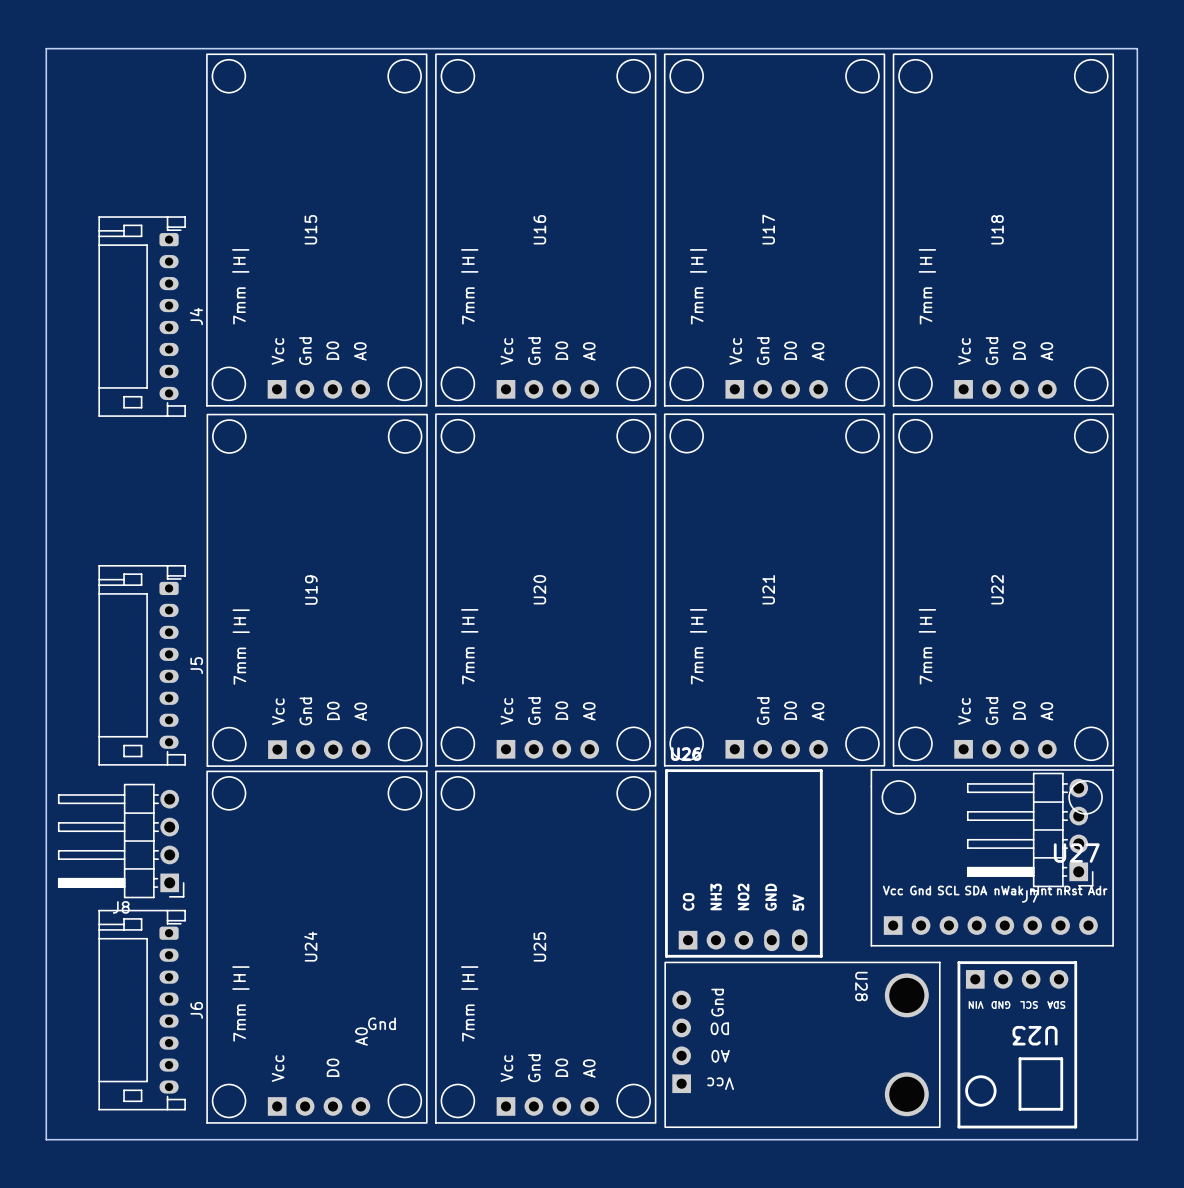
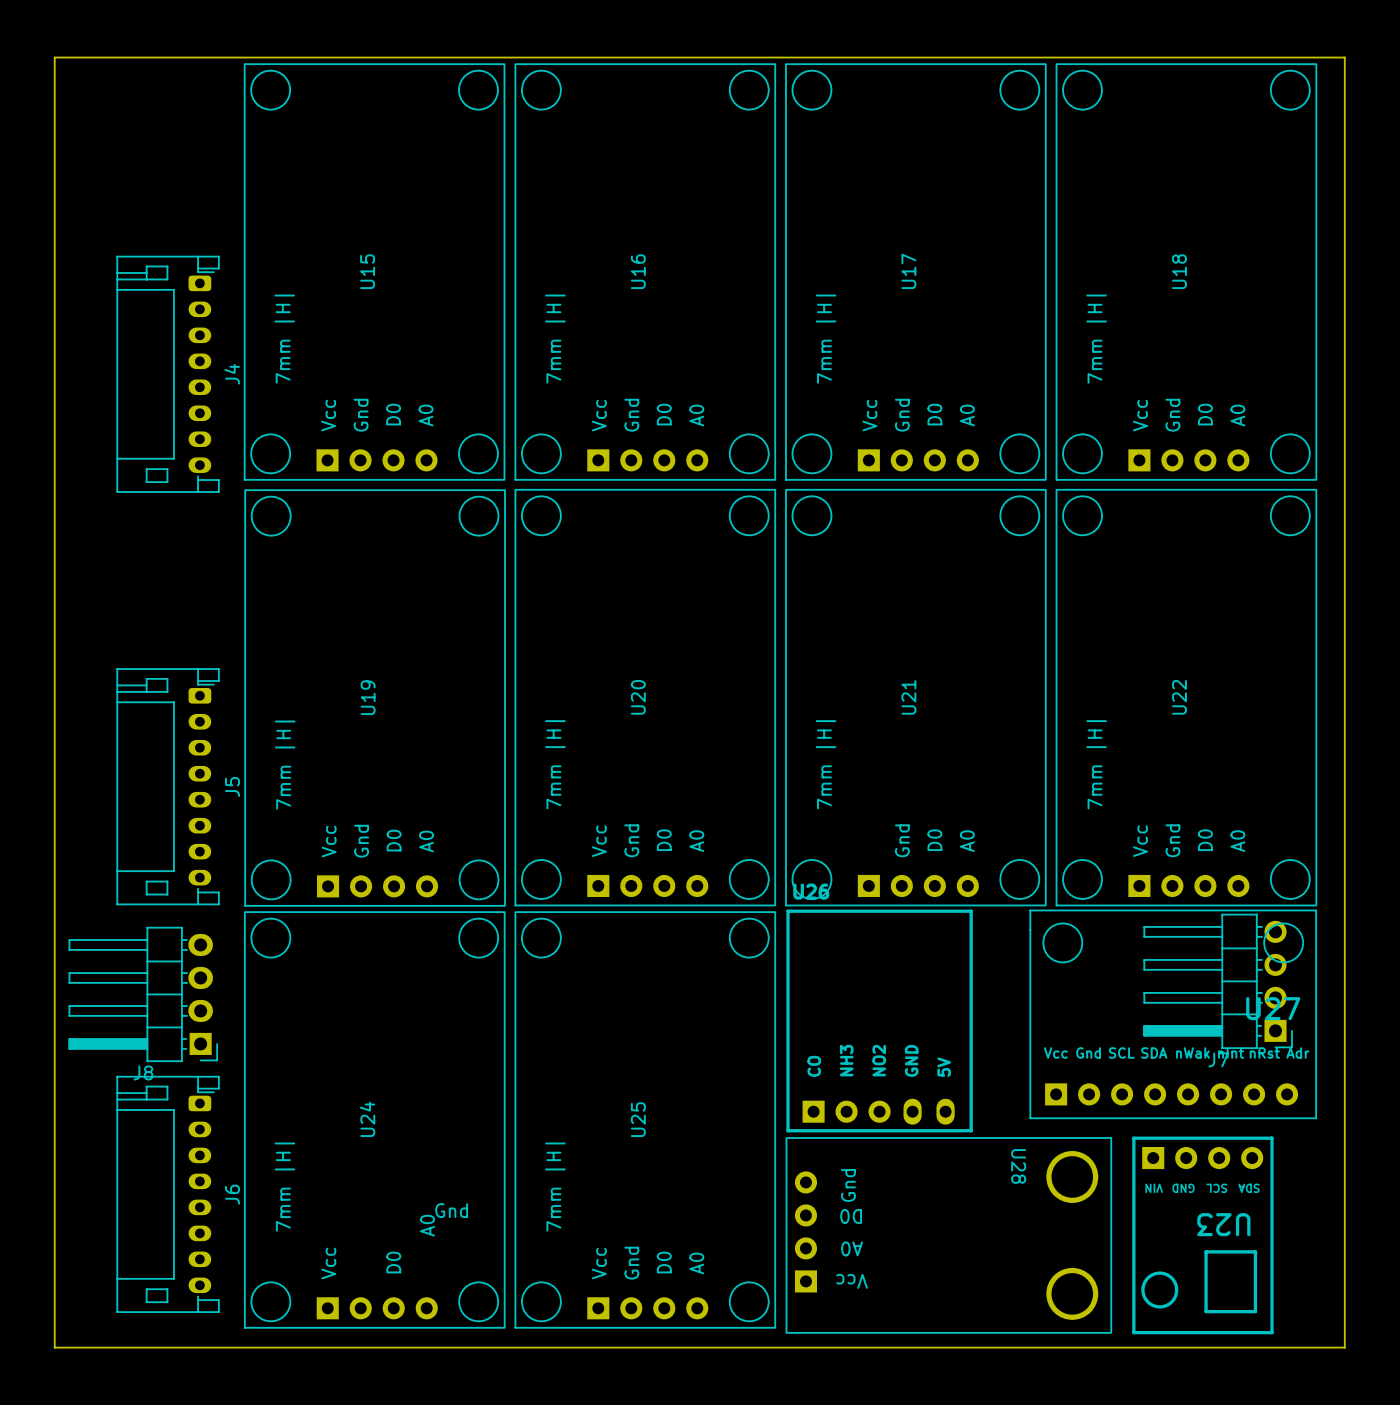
J8 footprint: [58, 783, 185, 899] -> [68, 926, 218, 1062]

